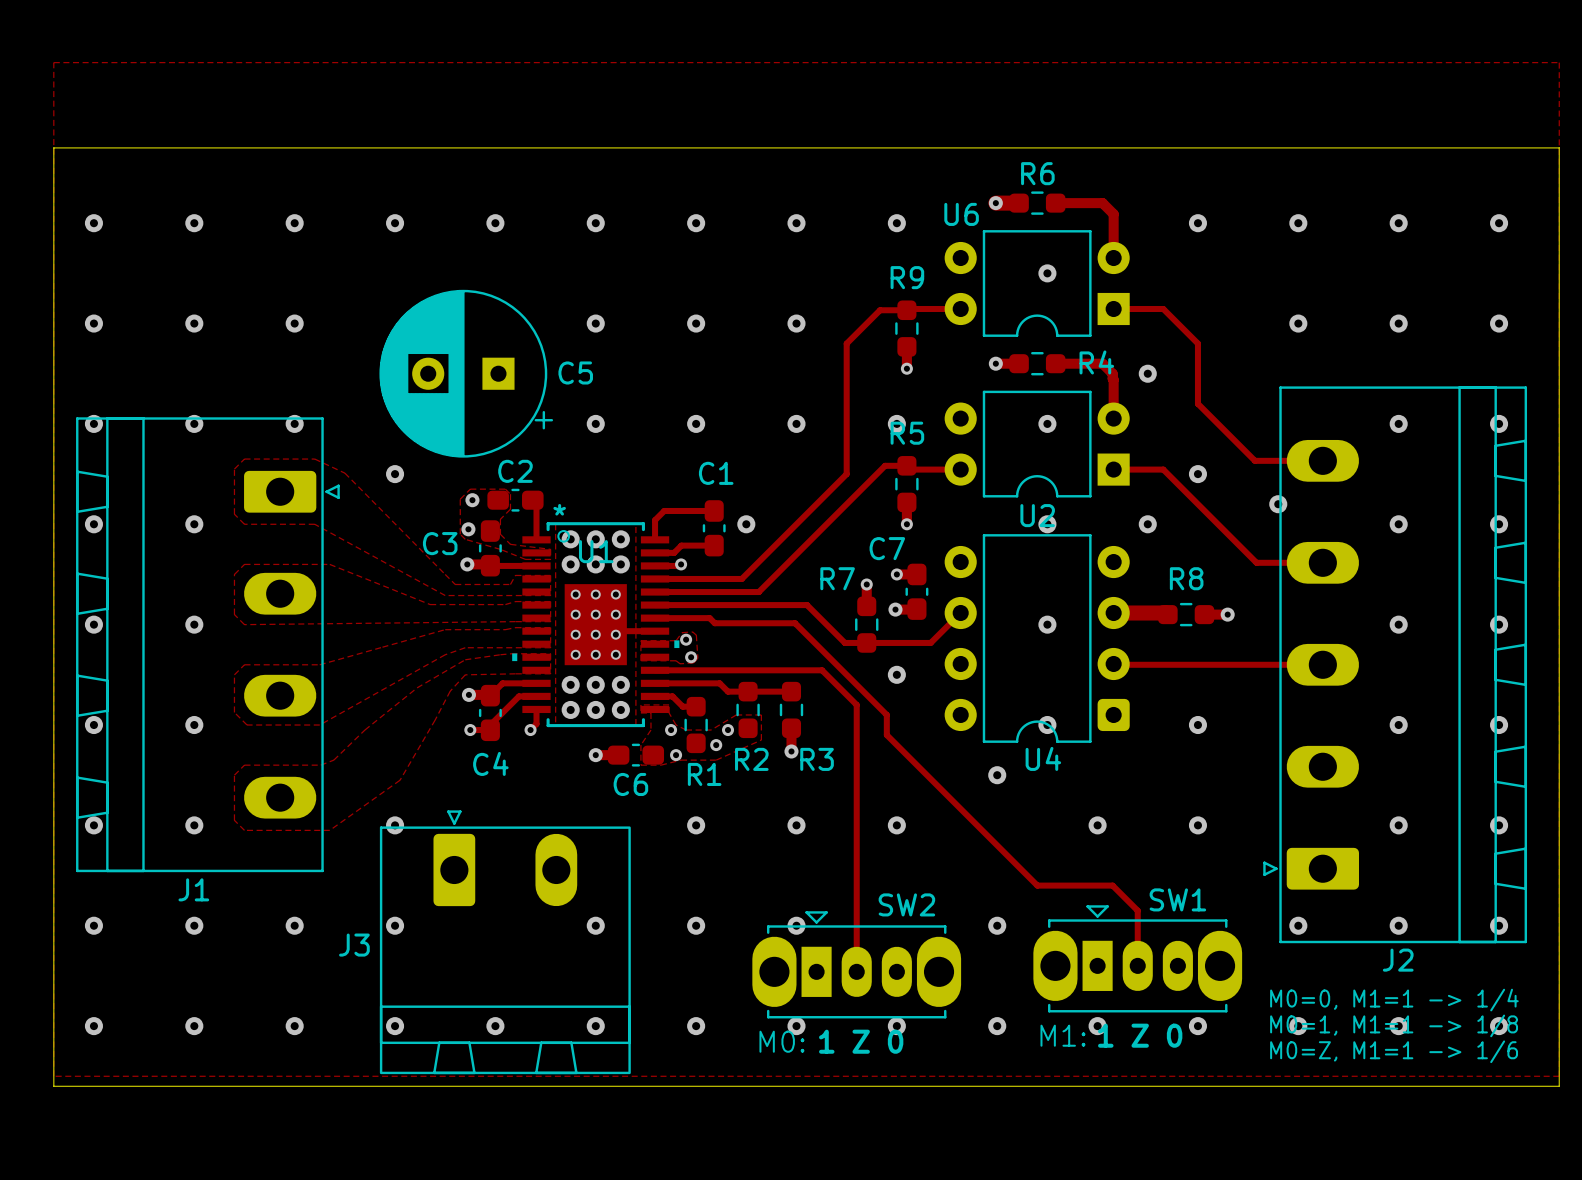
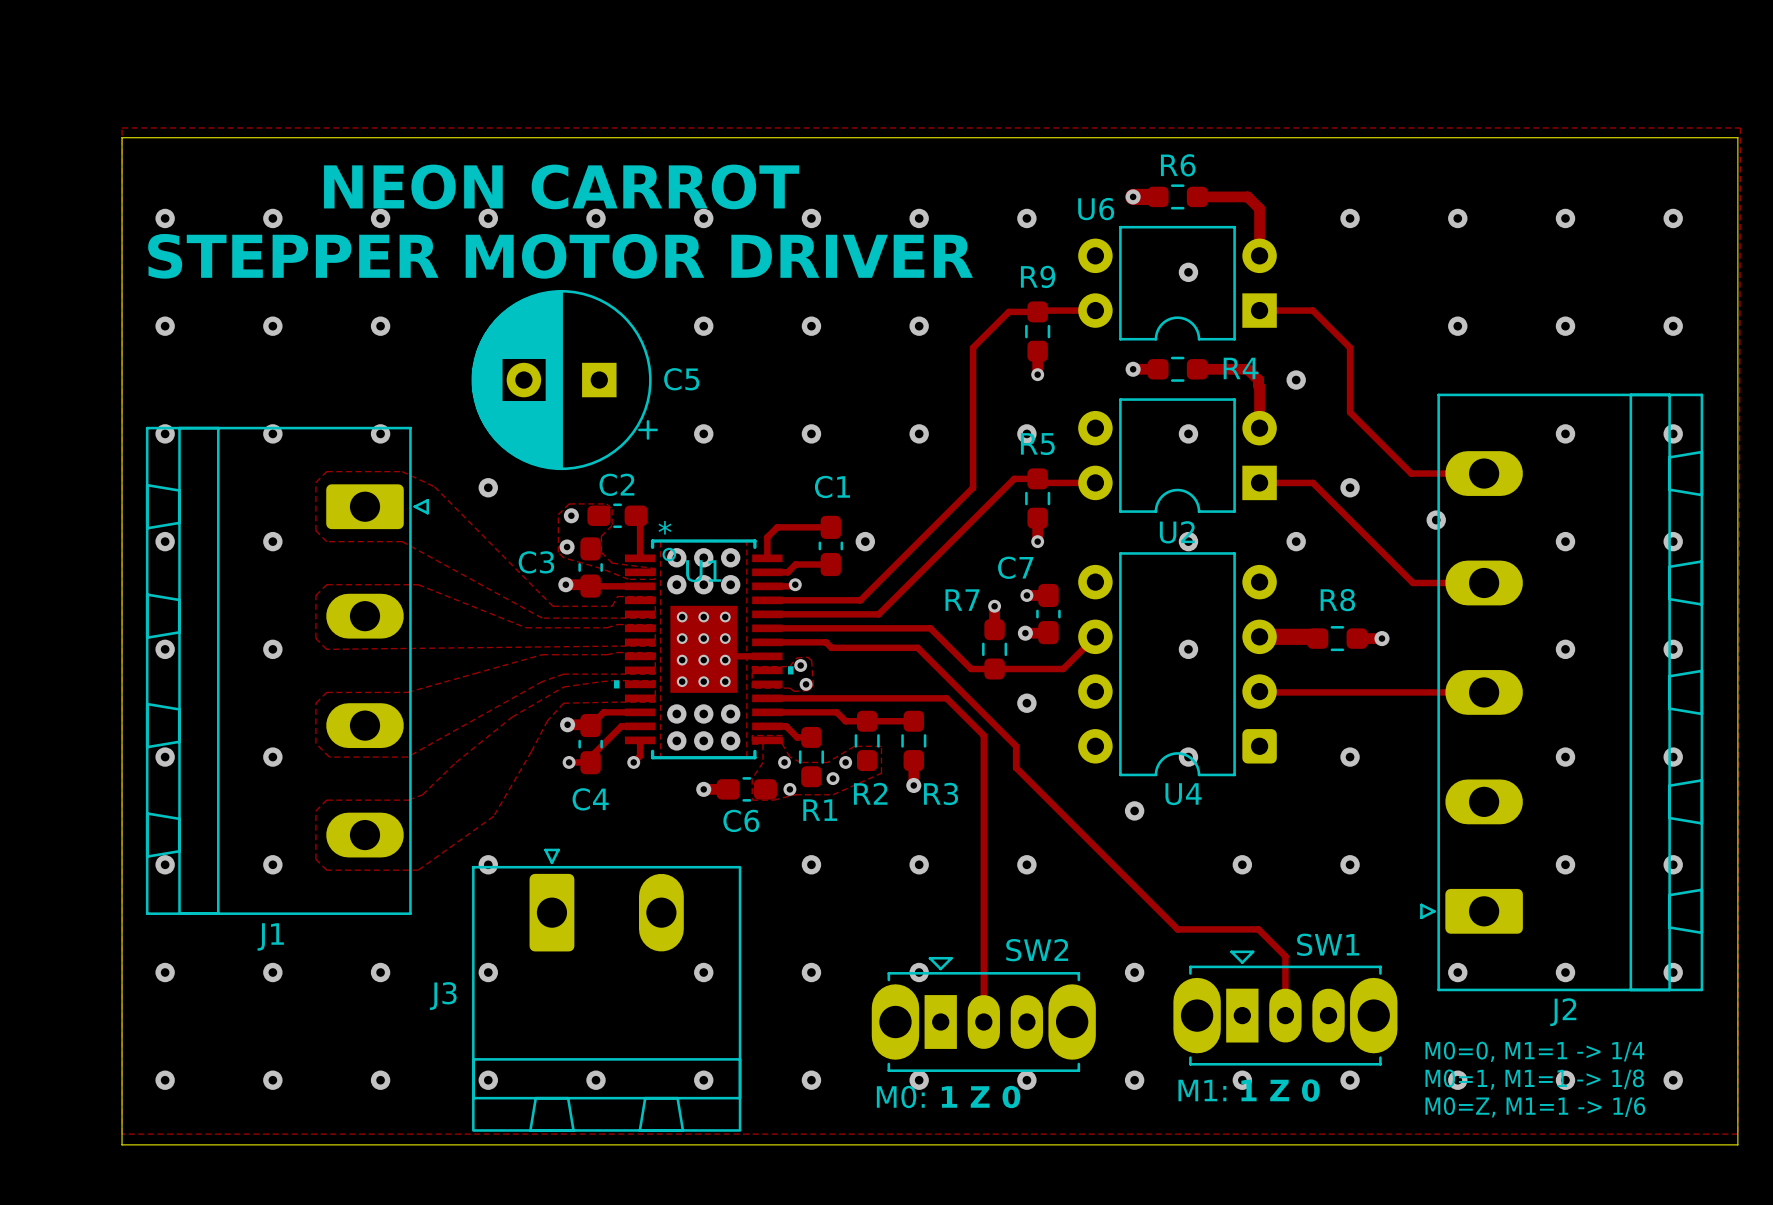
zone outline: (53, 138) (53, 62) (1559, 62) (1559, 1076) -> (122, 127) (1740, 127) (1737, 1134)
text: none -> NEON CARROT (561, 186)
text: none -> STEPPER MOTOR DRIVER (560, 256)

